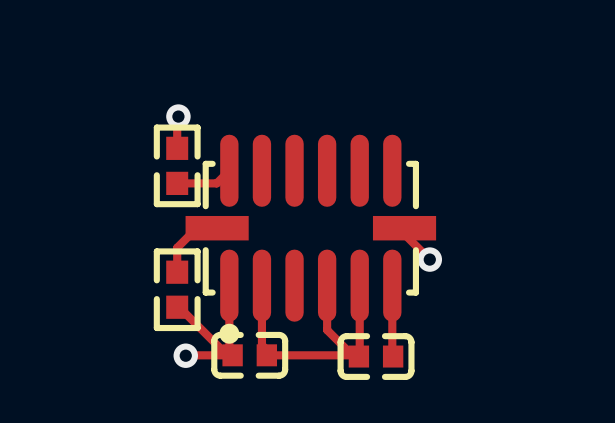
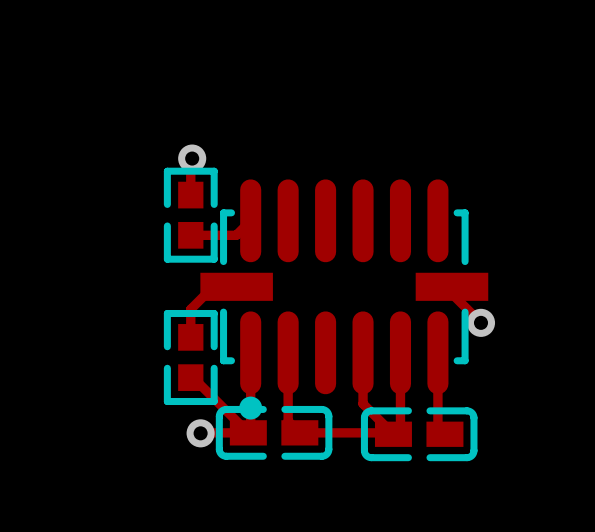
part footprint: [211, 331, 289, 379] -> [215, 405, 333, 460]
part footprint: [337, 333, 415, 380] -> [360, 407, 478, 462]

